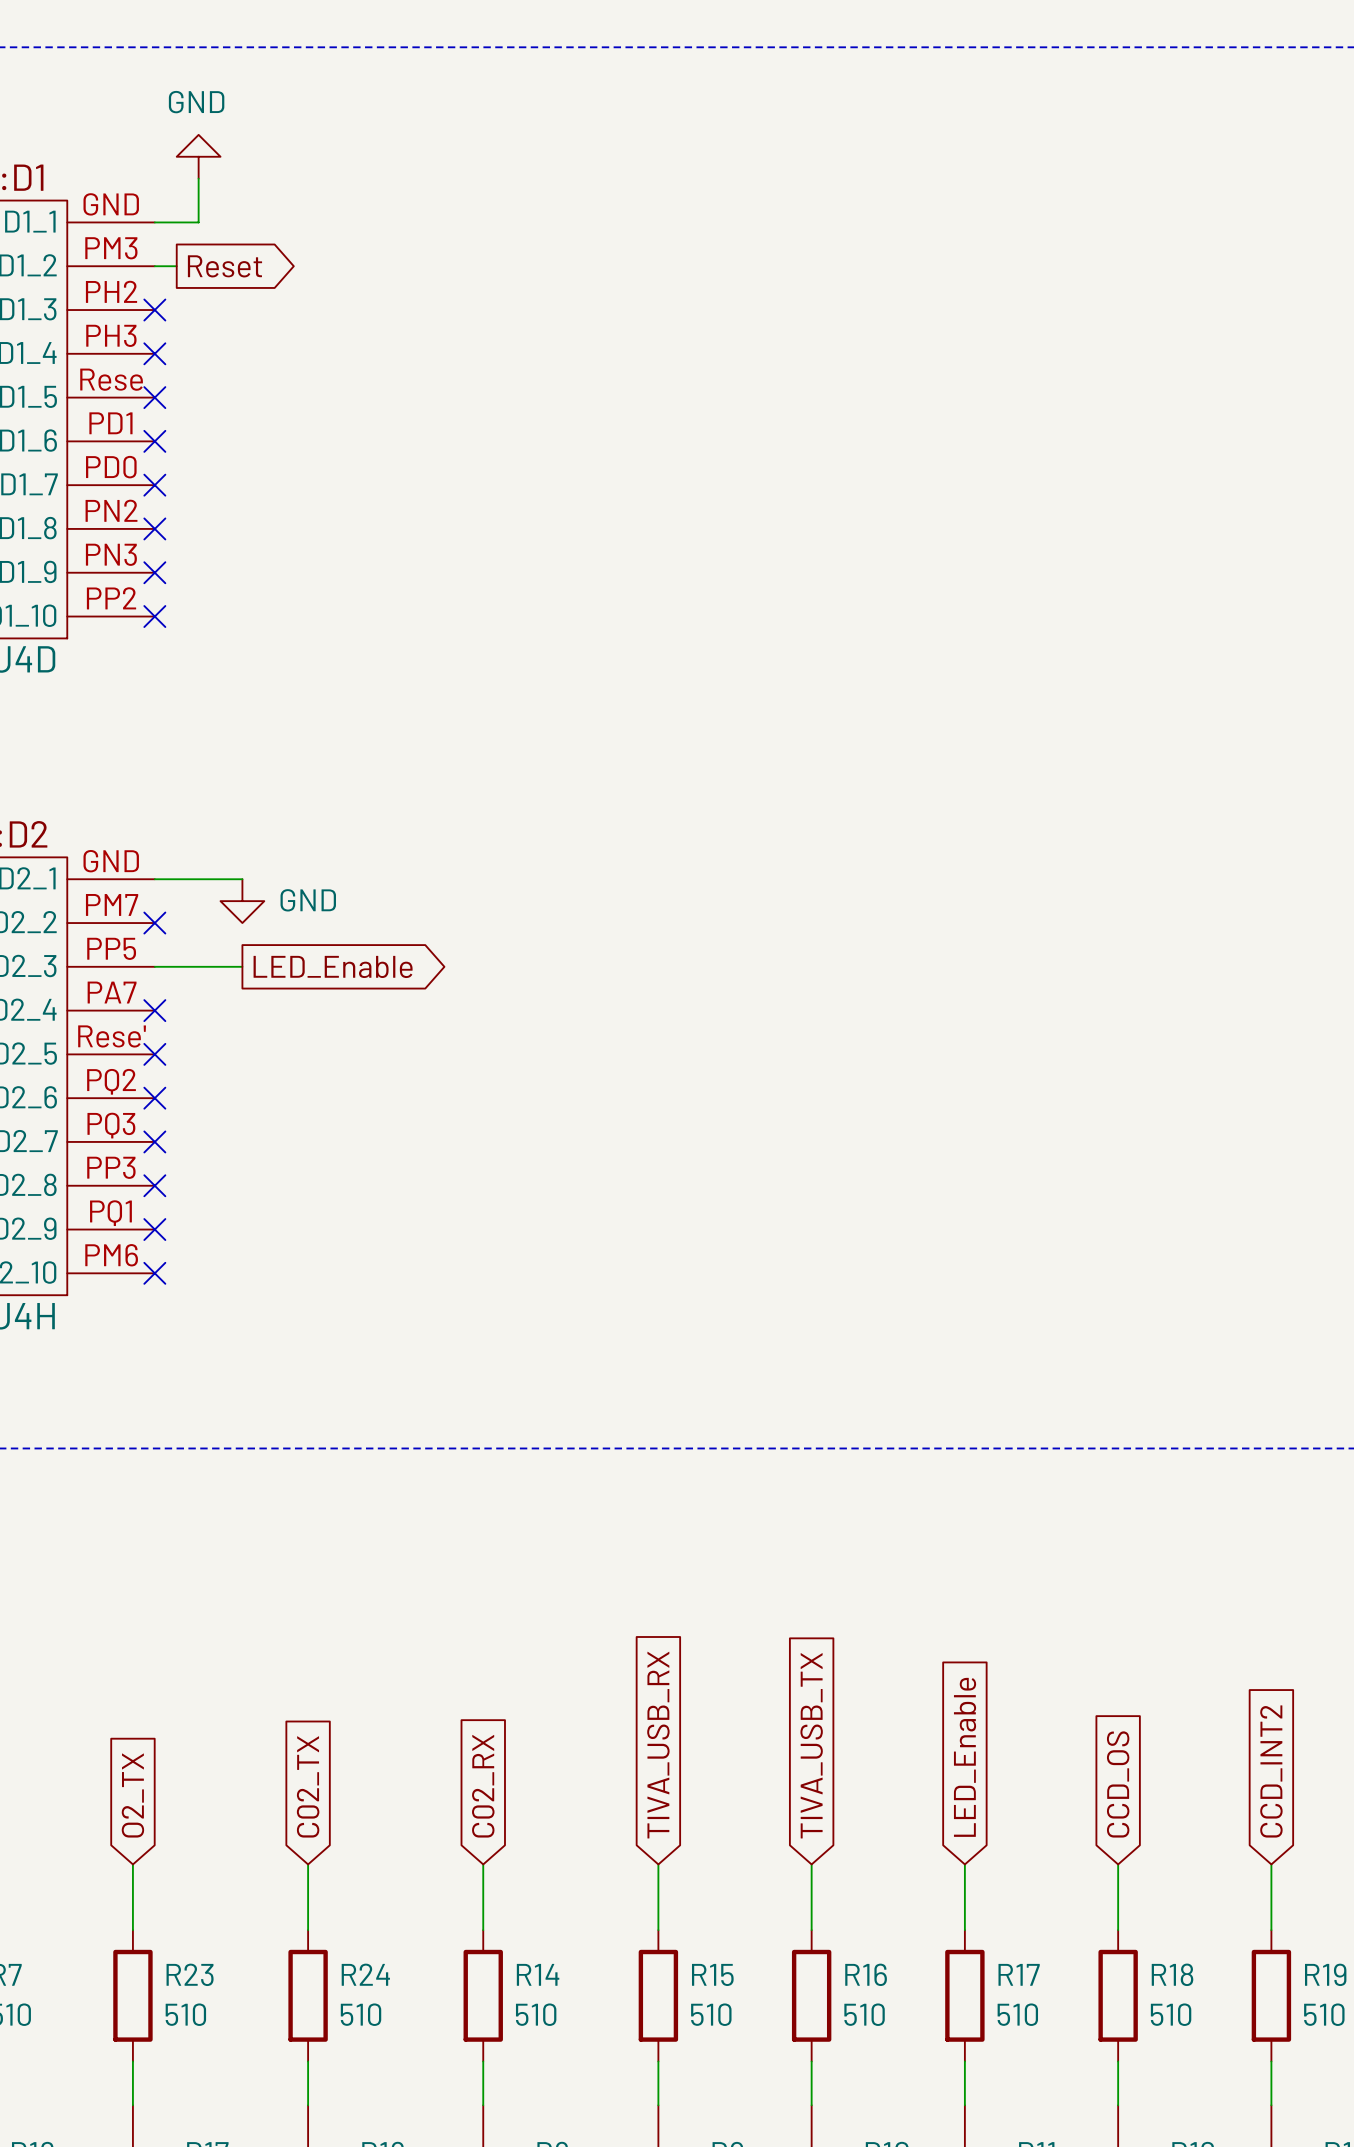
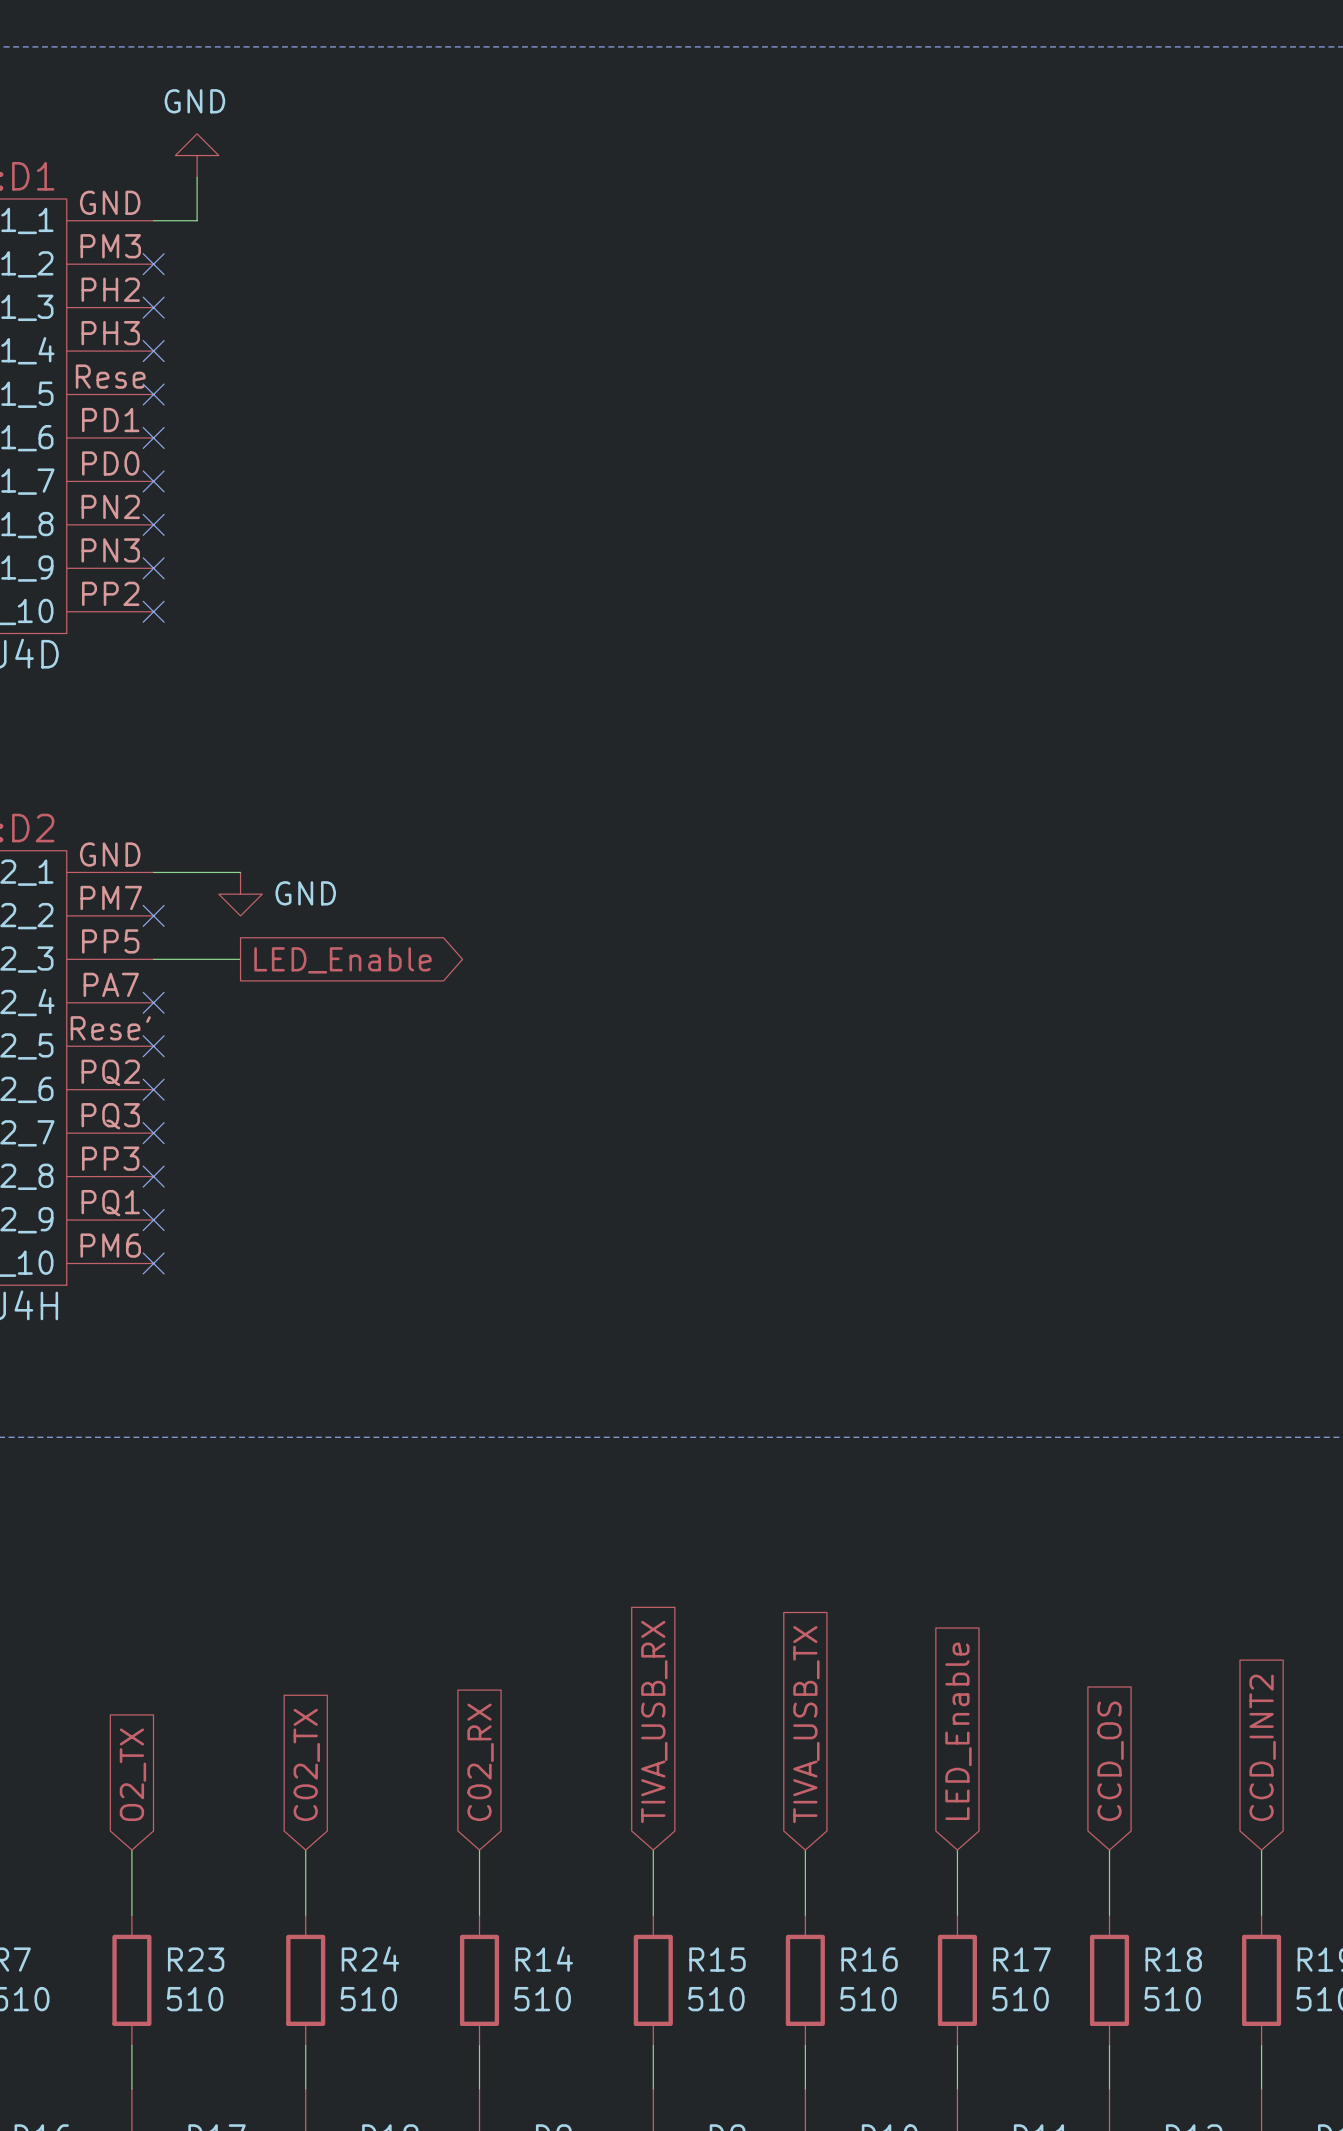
wire: (154, 266) (176, 266) -> none
no-connect mark: none -> (153, 264)
global label: Reset (224, 266) -> none

